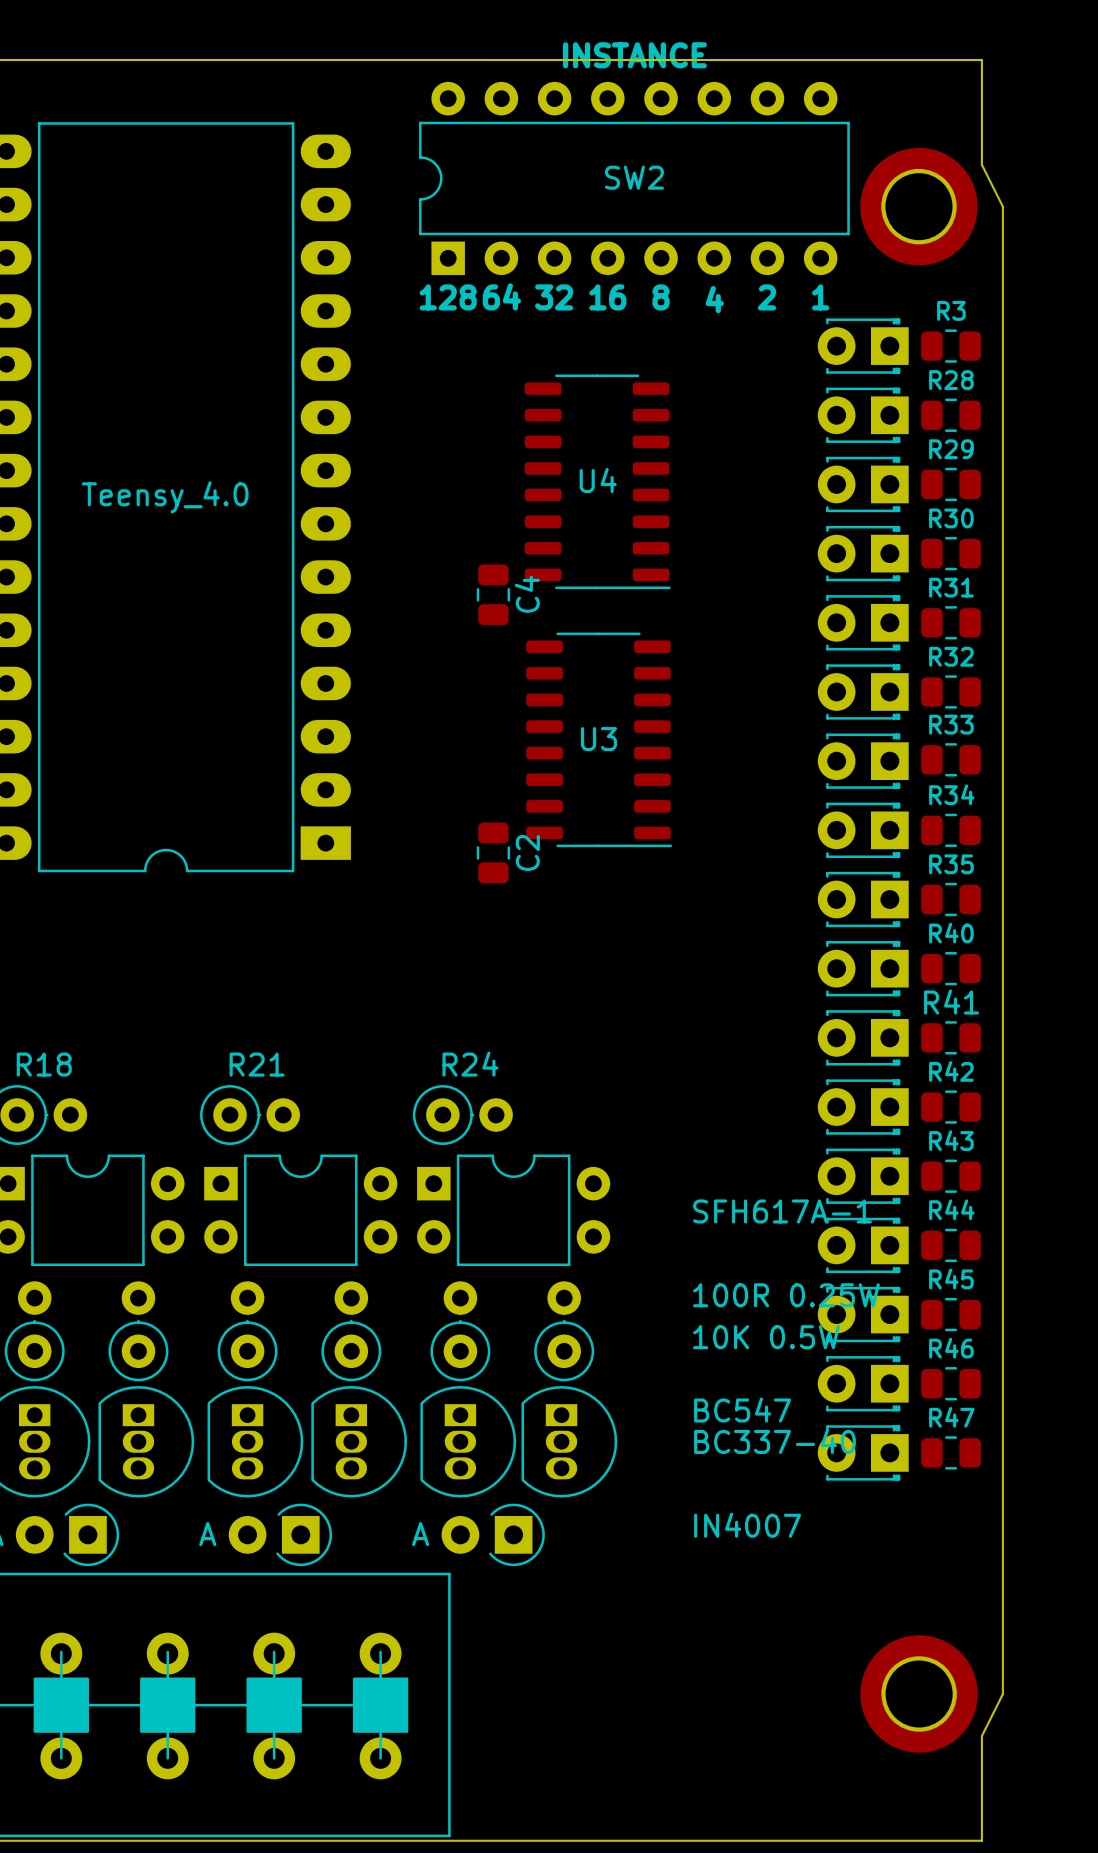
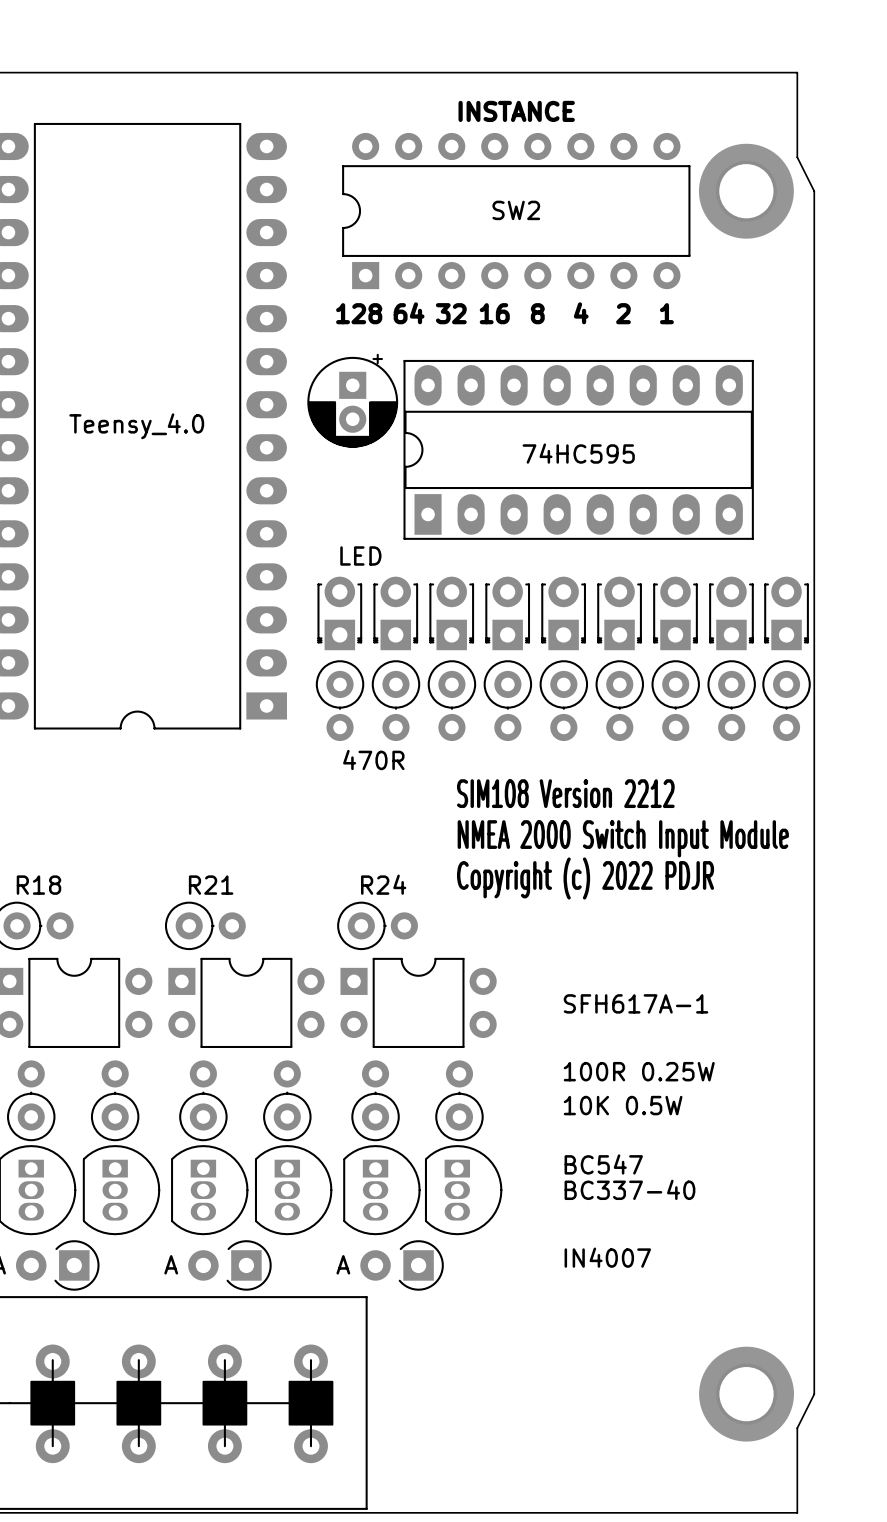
SW2 position: (634, 178) -> (516, 211)
text position: 64 (501, 296) -> 64 (409, 313)
text position: 128 (448, 297) -> 128 (359, 313)
text position: 32 (554, 297) -> 32 (451, 313)
text position: 16 (607, 297) -> 16 (494, 313)
text position: 8 (661, 297) -> 8 (537, 313)
text position: 2 (766, 297) -> 2 (623, 313)
text position: 1 (820, 297) -> 1 (666, 313)
text position: 4 (714, 299) -> 4 (581, 313)
part: (863, 346) -> none
R3: (951, 346) -> none
part: (863, 415) -> none
R28: (951, 415) -> none
part: none -> (352, 400)
U4: (597, 481) -> none
part: (863, 484) -> none
R29: (951, 484) -> none
part: none -> 74HC595 (578, 449)
part: (863, 553) -> none
R30: (951, 553) -> none
C4: (493, 594) -> none
part: (863, 622) -> none
R31: (951, 622) -> none
part: (863, 691) -> none
R32: (951, 691) -> none
part: none -> LED (339, 613)
part: none -> (395, 613)
part: none -> (451, 613)
part: none -> (507, 613)
part: none -> (563, 613)
part: none -> (619, 613)
part: none -> (675, 613)
part: none -> (731, 613)
part: none -> (786, 613)
U3: (599, 739) -> none
R33: (951, 759) -> none
part: (863, 761) -> none
part: (863, 830) -> none
R34: (951, 830) -> none
part: none -> 470R (340, 700)
part: none -> (395, 700)
part: none -> (451, 700)
part: none -> (507, 700)
part: none -> (563, 700)
part: none -> (619, 700)
part: none -> (675, 700)
part: none -> (731, 700)
part: none -> (786, 700)
C2: (493, 852) -> none
part: (863, 899) -> none
R35: (951, 899) -> none
text: none -> SIM108 Version 2212 (565, 793)
part: (863, 968) -> none
R40: (951, 968) -> none
text: none -> NMEA 2000 Switch Input Module (623, 838)
part: (863, 1037) -> none
R41: (951, 1037) -> none
text: none -> Copyright (c) 2022 PDJR (585, 878)
part: (863, 1107) -> none
R42: (951, 1107) -> none
part: (863, 1176) -> none
R43: (951, 1176) -> none
part: (863, 1245) -> none
R44: (951, 1245) -> none
part: (863, 1314) -> none
R45: (951, 1314) -> none
part: (863, 1383) -> none
R46: (951, 1383) -> none
part: (863, 1452) -> none
R47: (951, 1452) -> none

